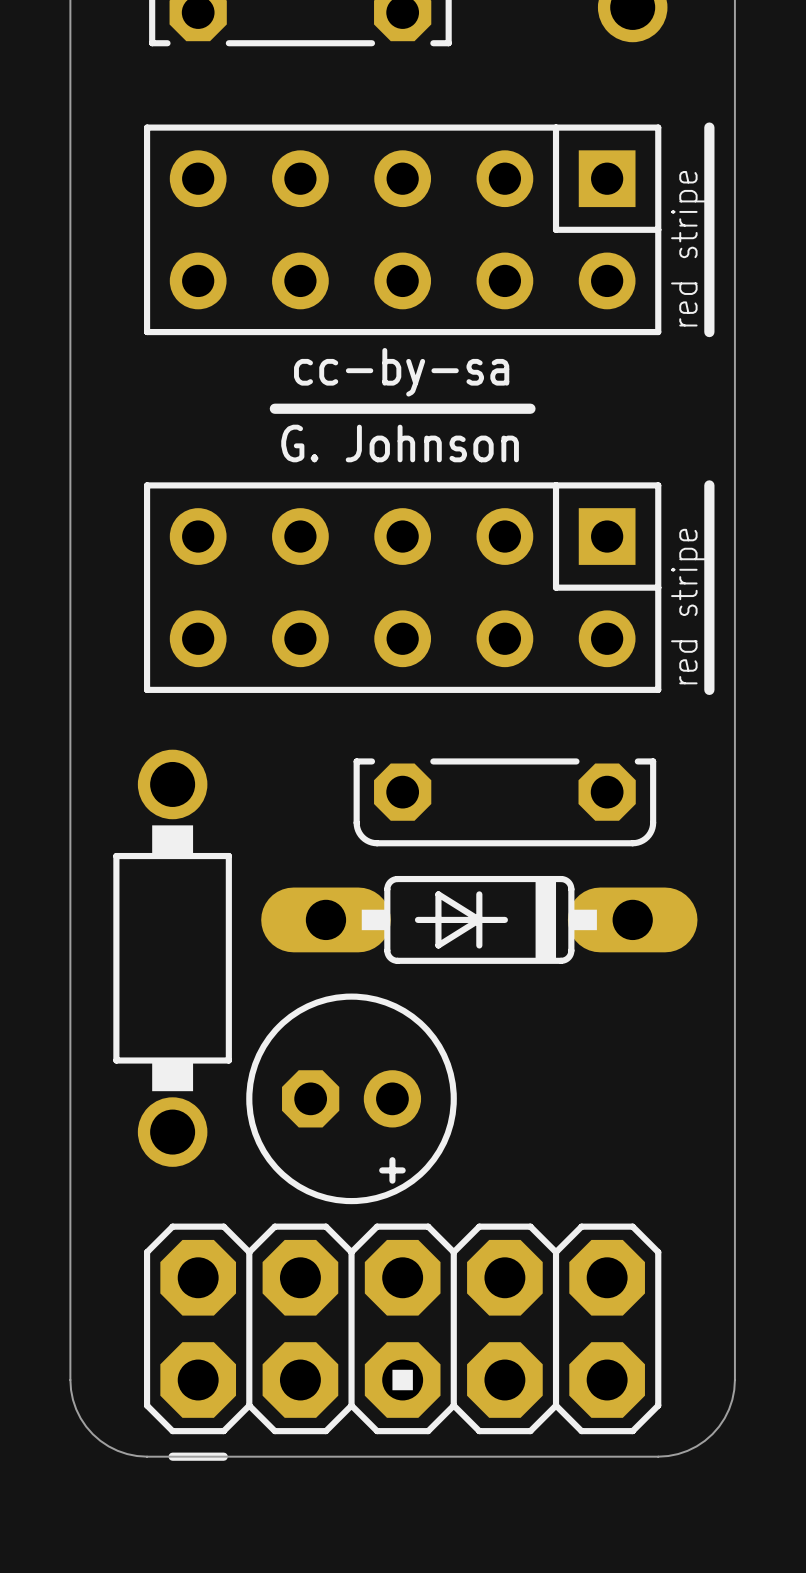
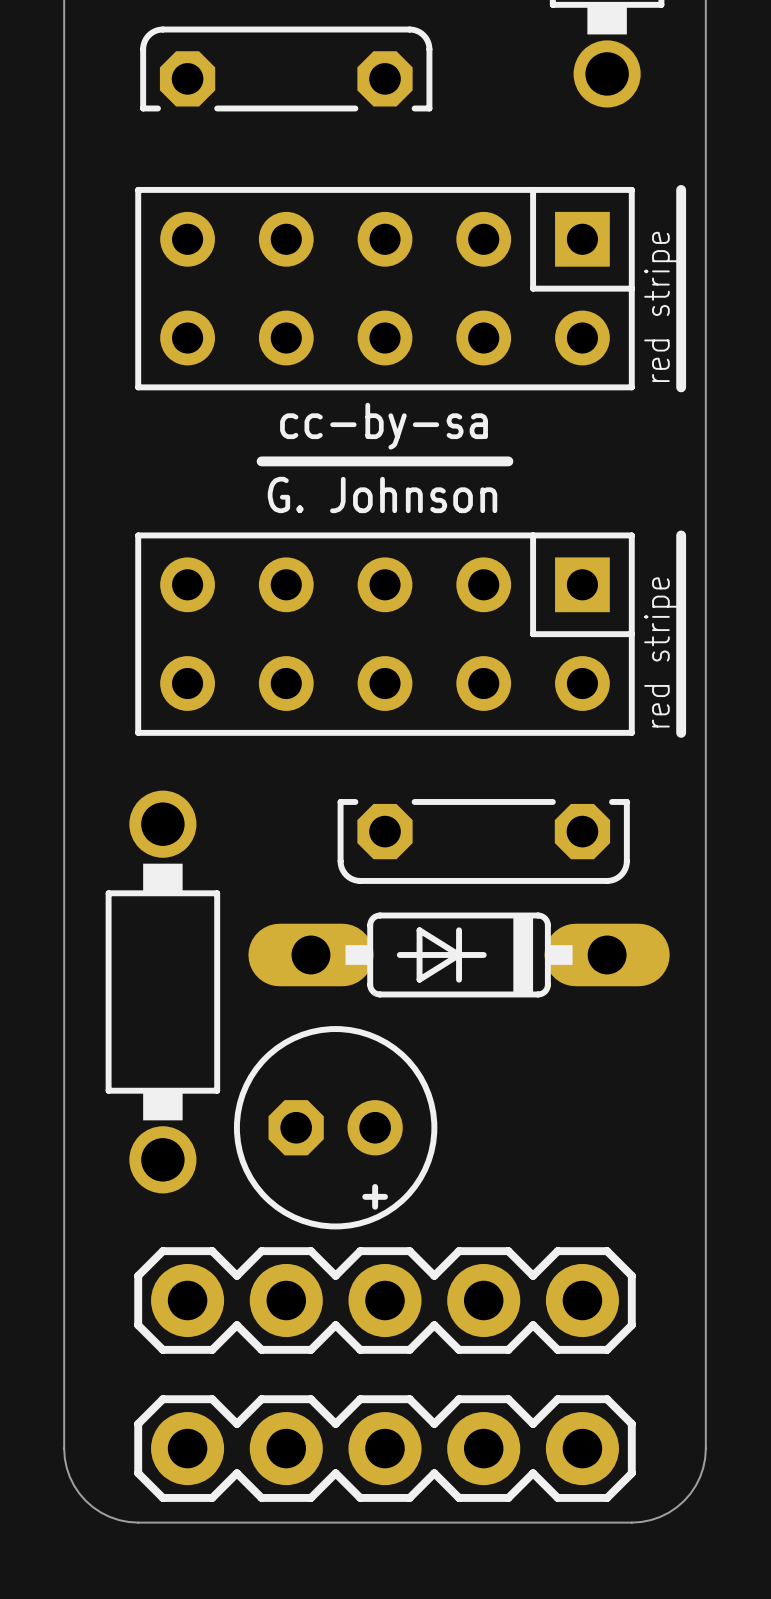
part: none -> (385, 1300)
part: (402, 1342) -> none
board edge: (70, 1380) (76, 1409) (92, 1434) (117, 1450) (147, 1456) (668, 1456) (696, 1446) (719, 1426) (732, 1399) (734, 1380) -> (64, 1399) (64, 1458) (74, 1485) (85, 1500) (101, 1512) (119, 1520) (138, 1522) (631, 1522) (650, 1520) (676, 1507) (690, 1493) (700, 1476) (705, 1458) (705, 1399)
part: none -> (385, 1448)

